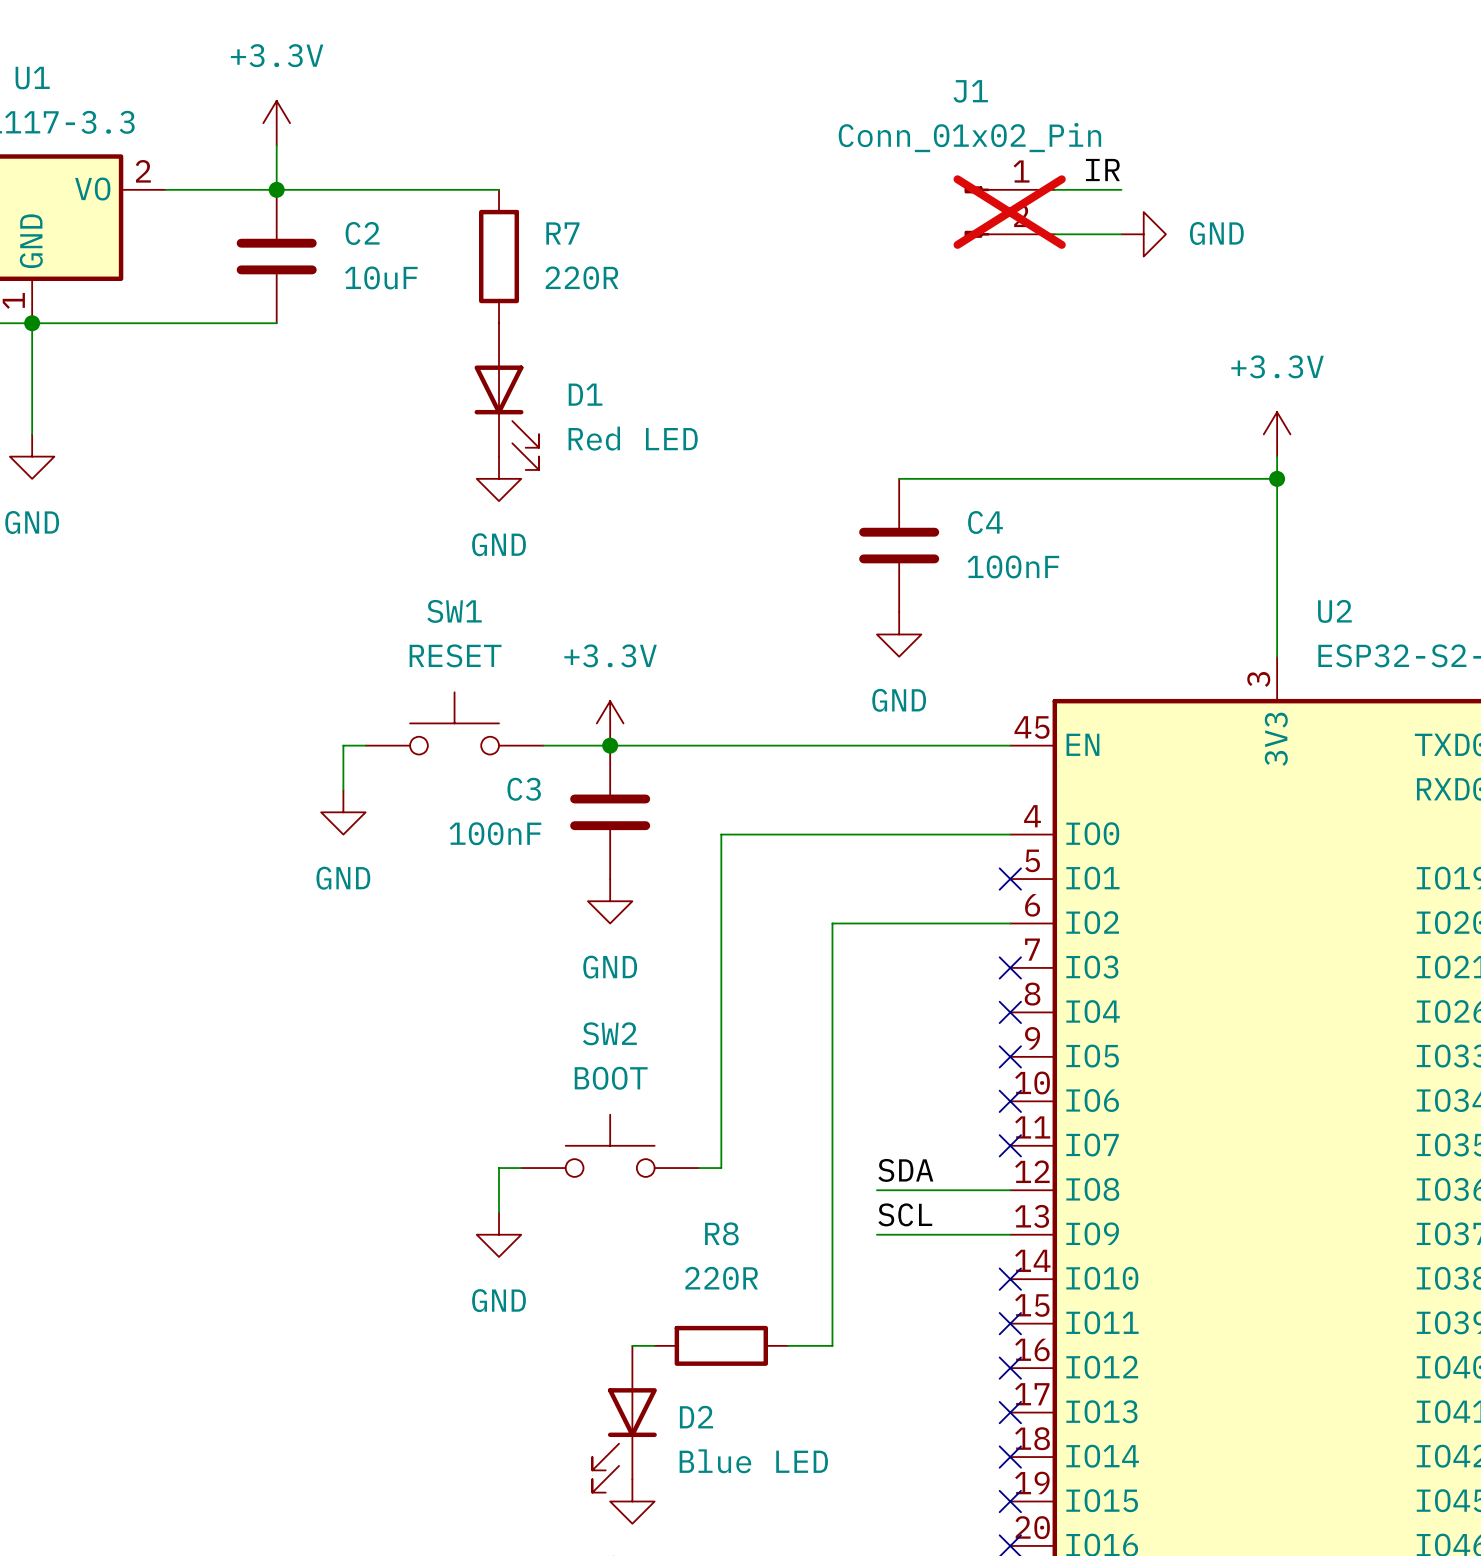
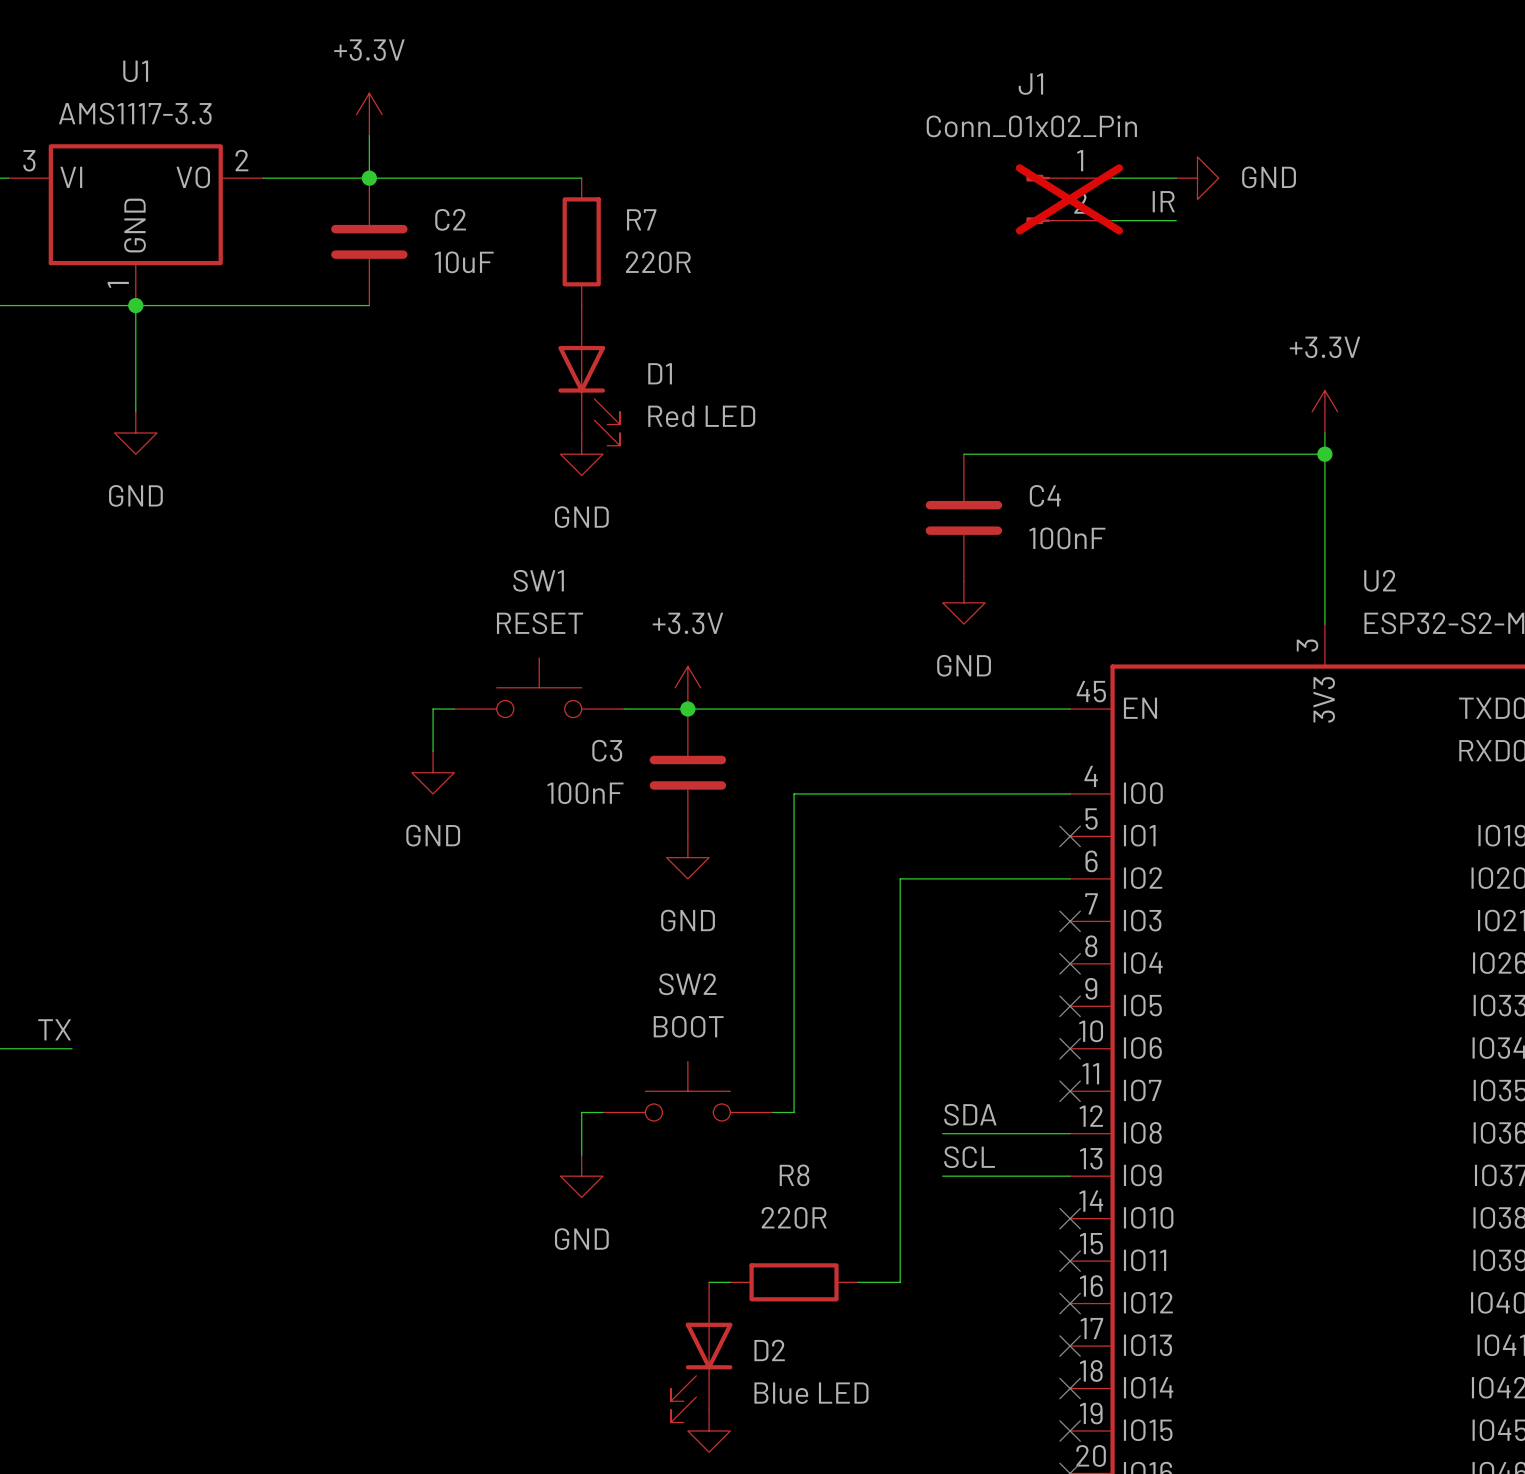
label position: IR (1102, 170) -> IR (1163, 201)
power symbol position: GND (1143, 234) -> GND (1197, 178)

